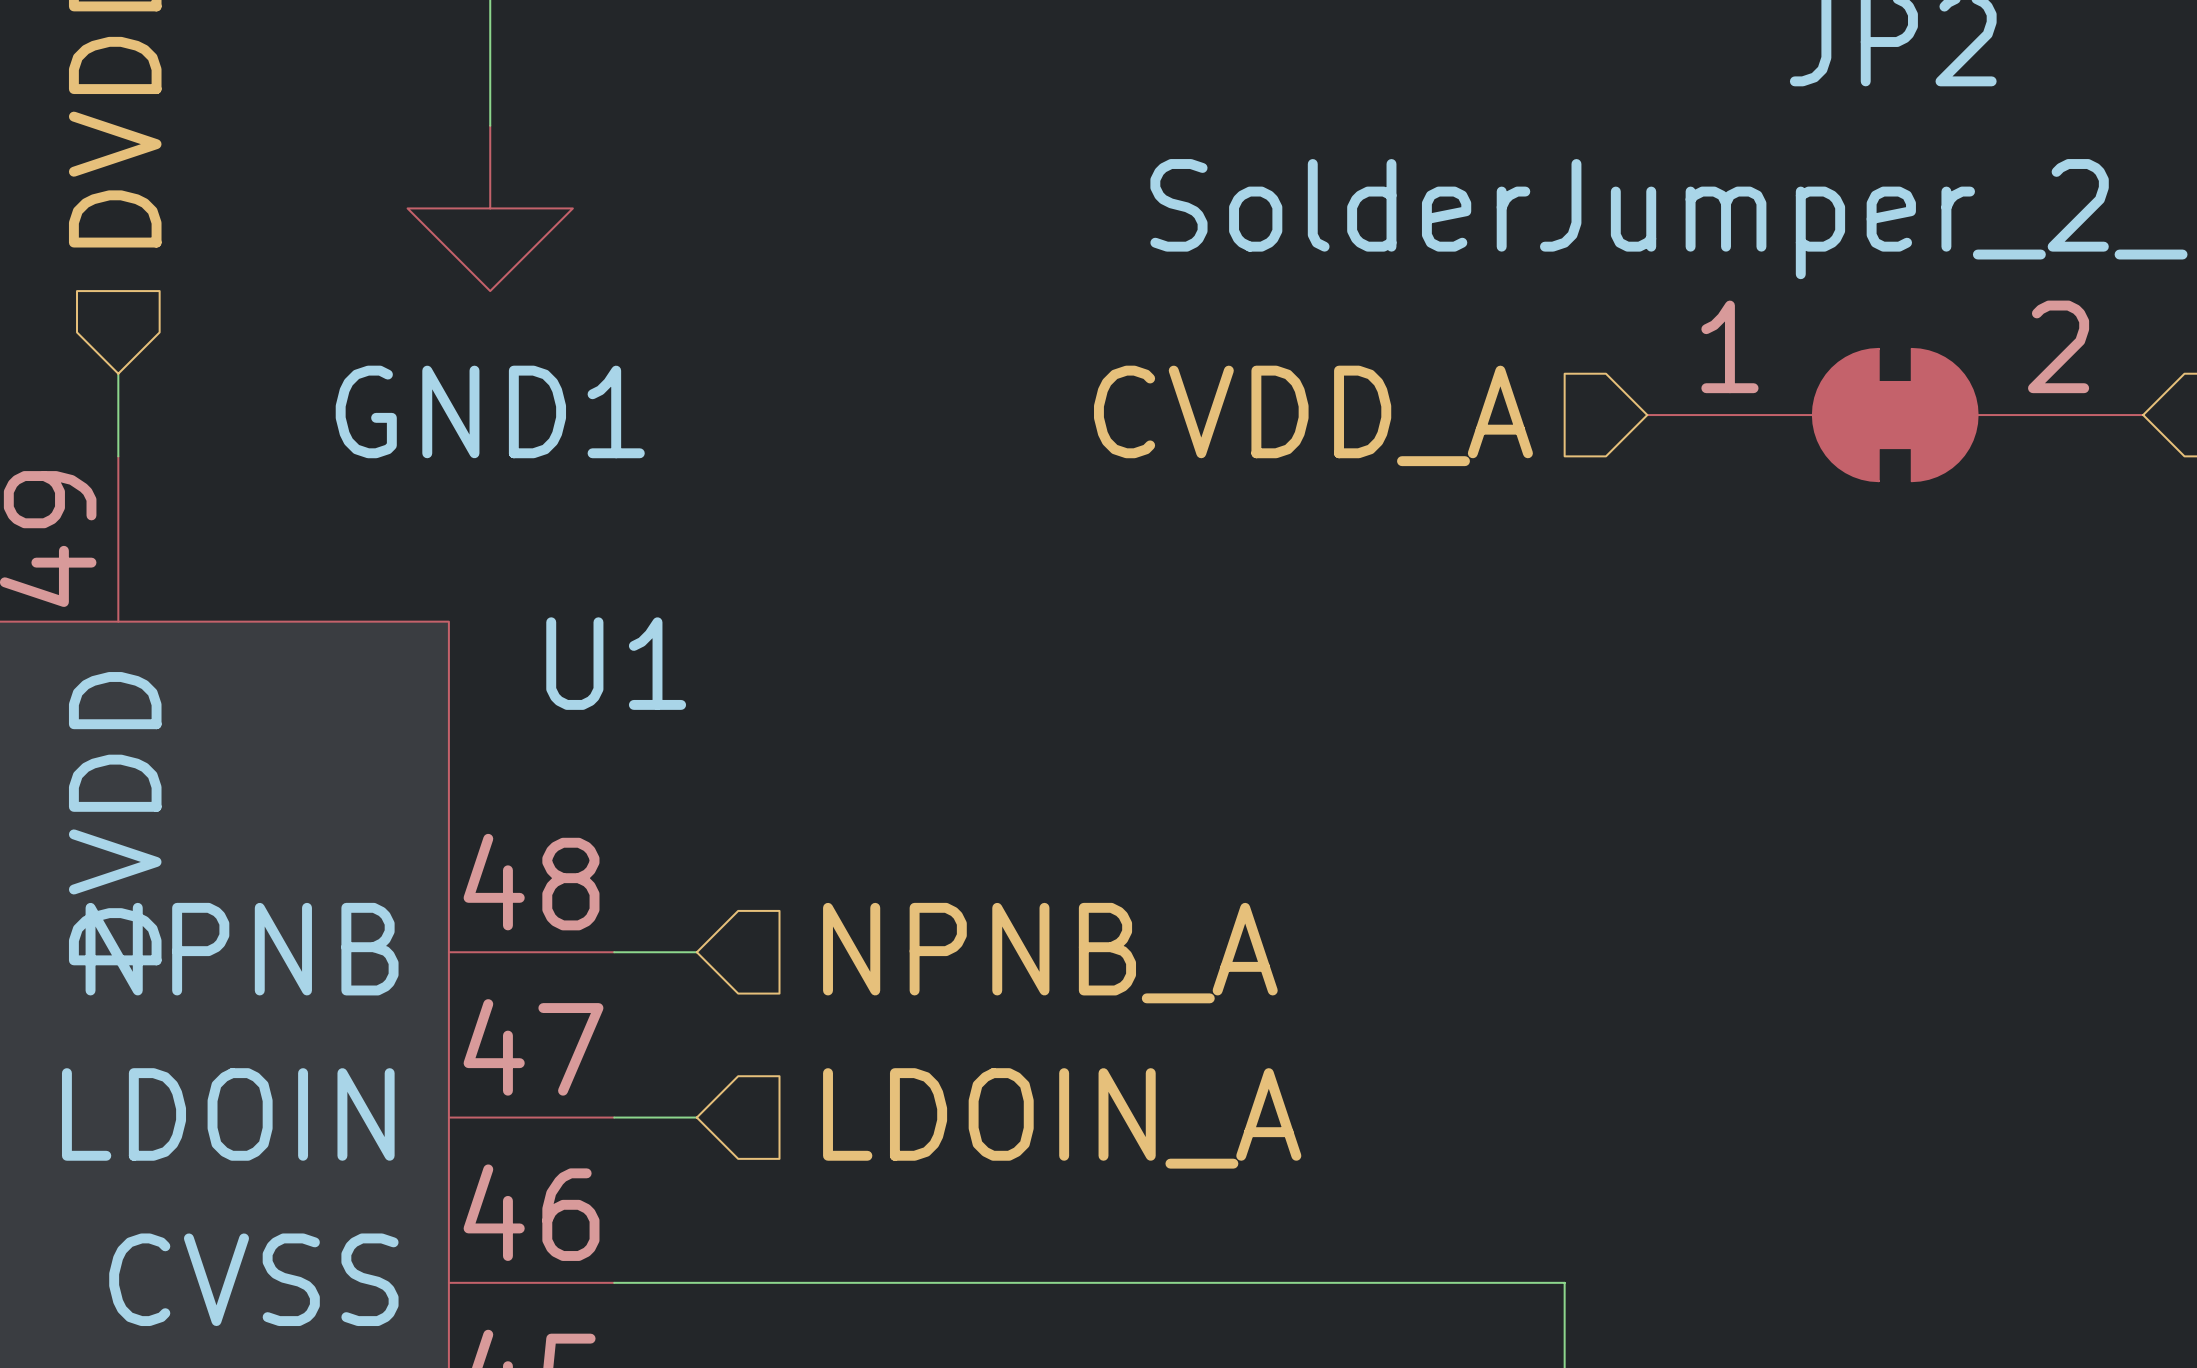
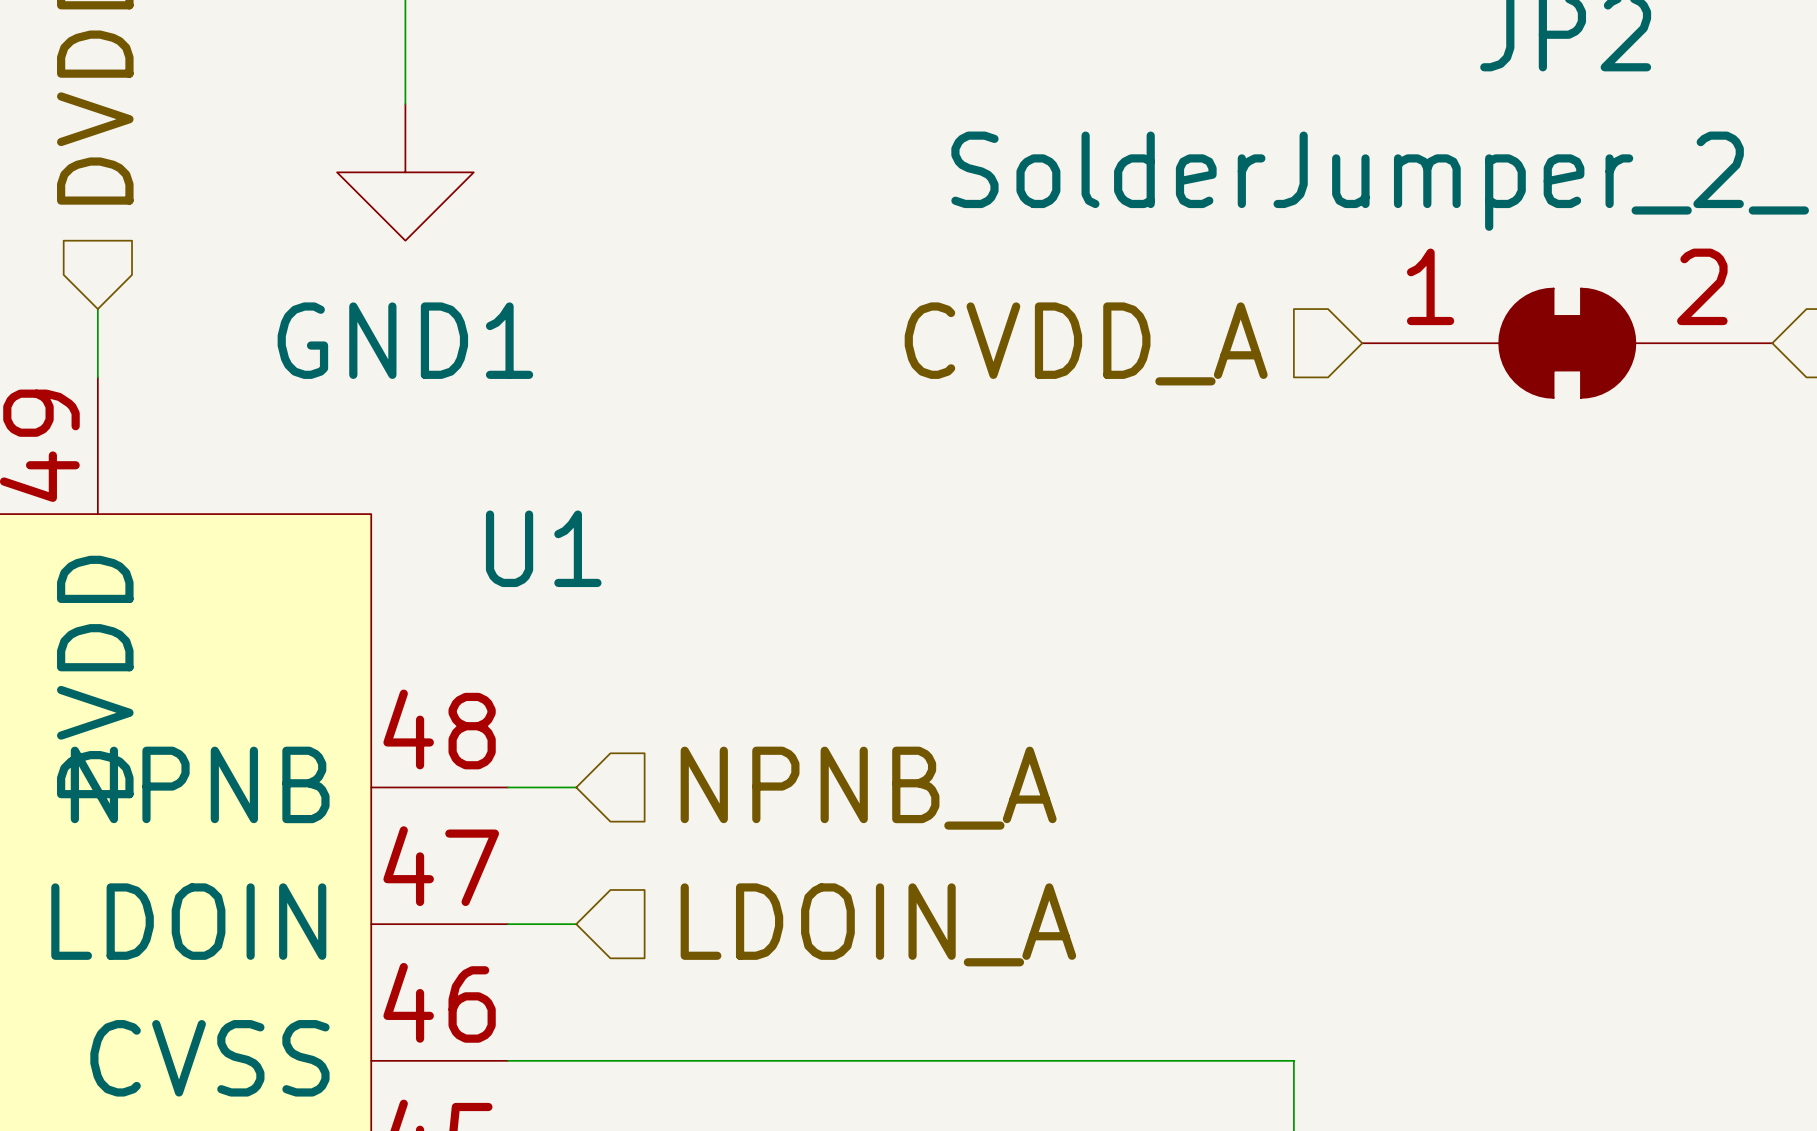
U1 name position: U1 (616, 663) -> U1 (543, 548)

